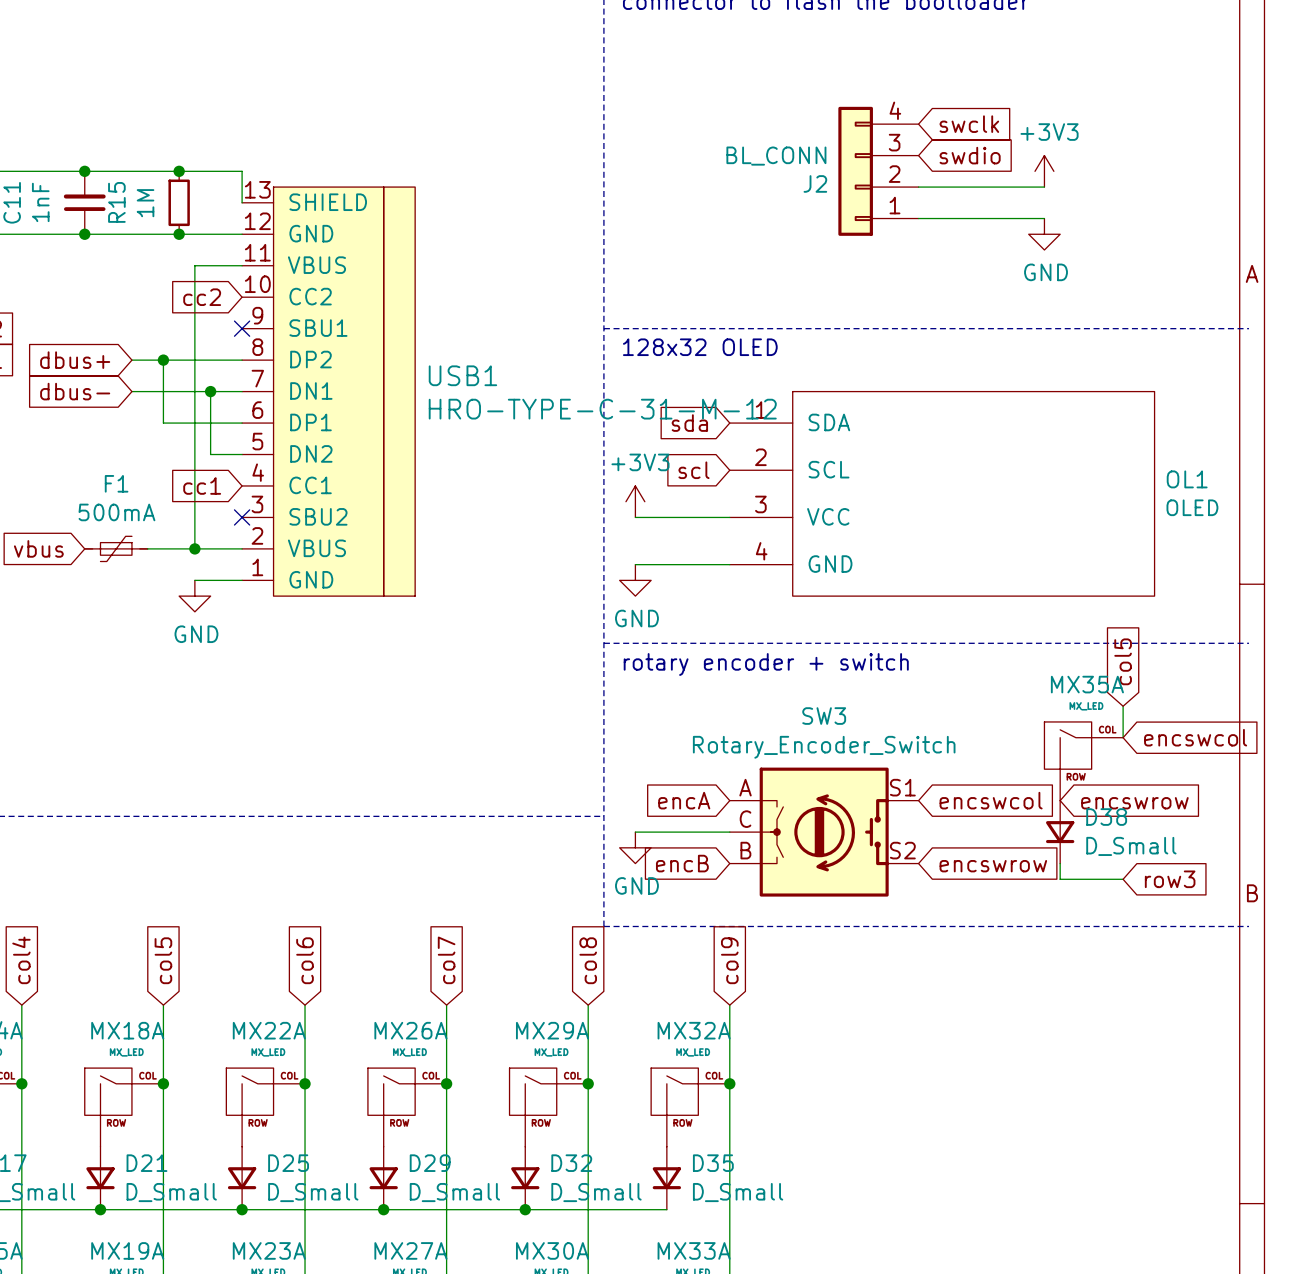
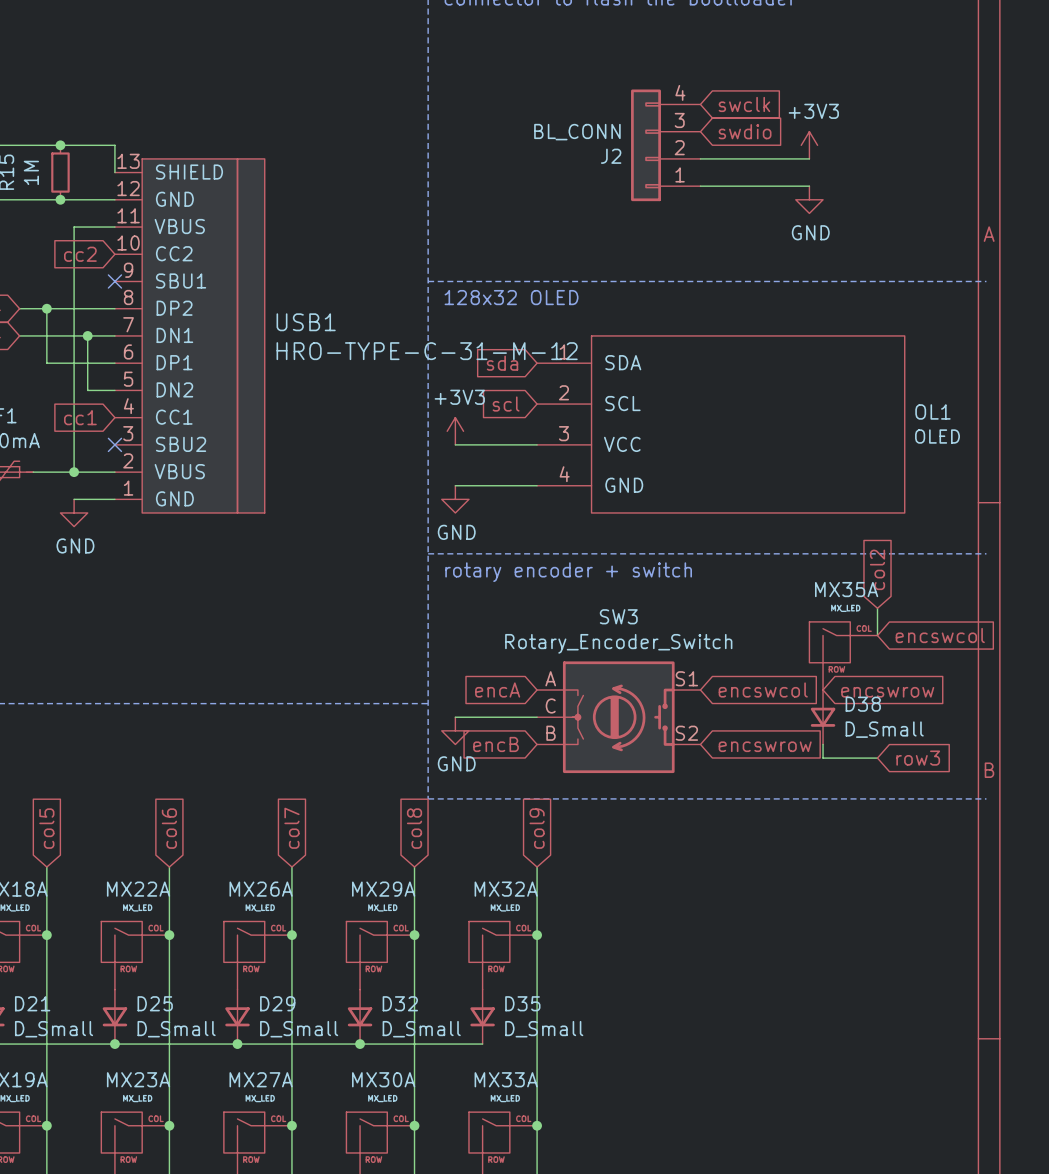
global label: col5 (1123, 661) -> col2 (877, 569)

